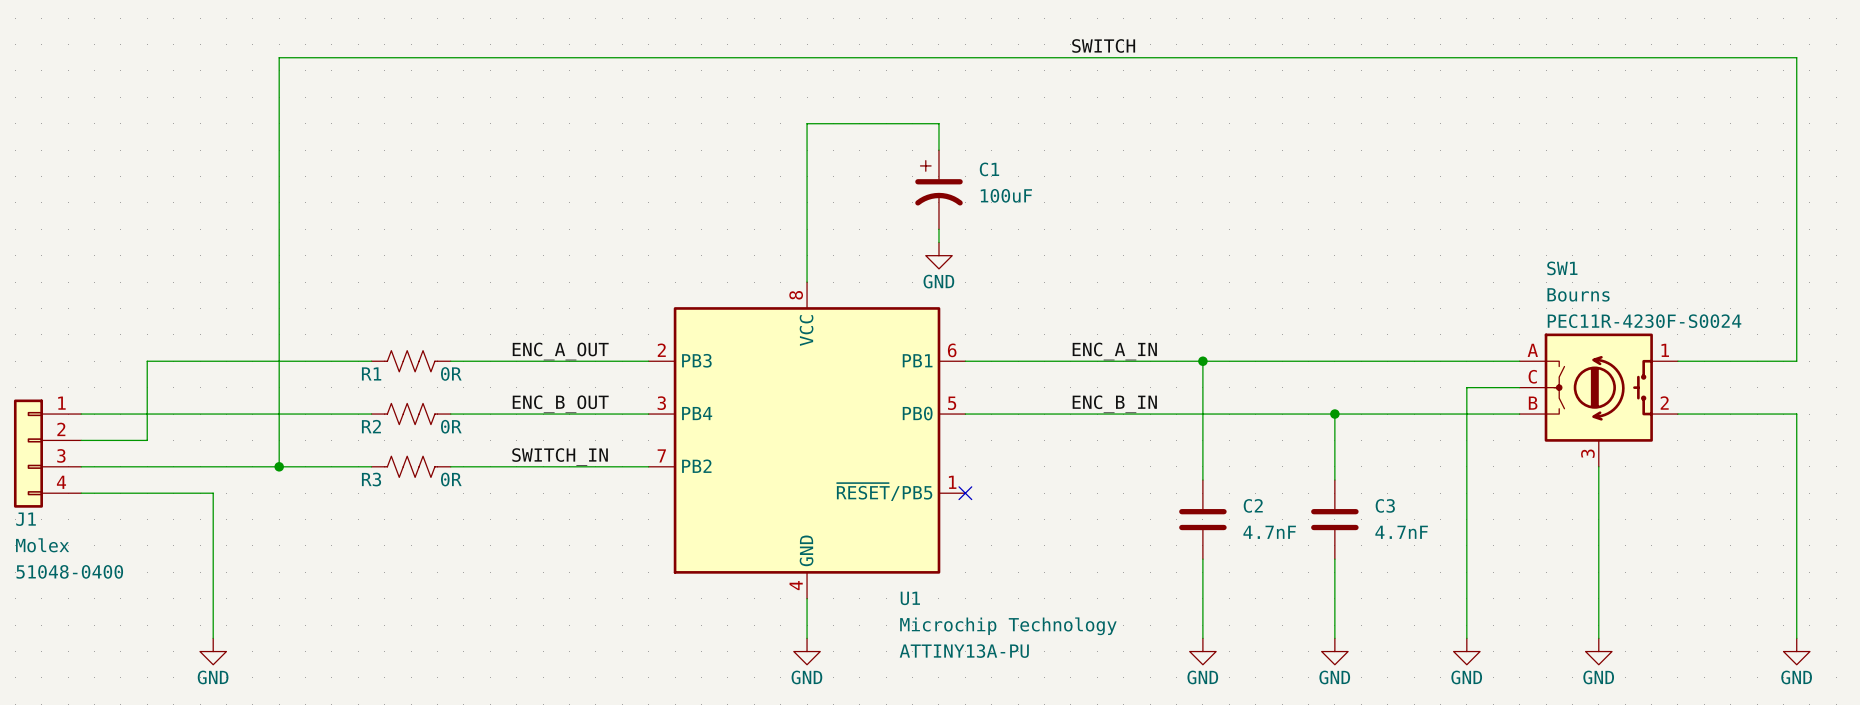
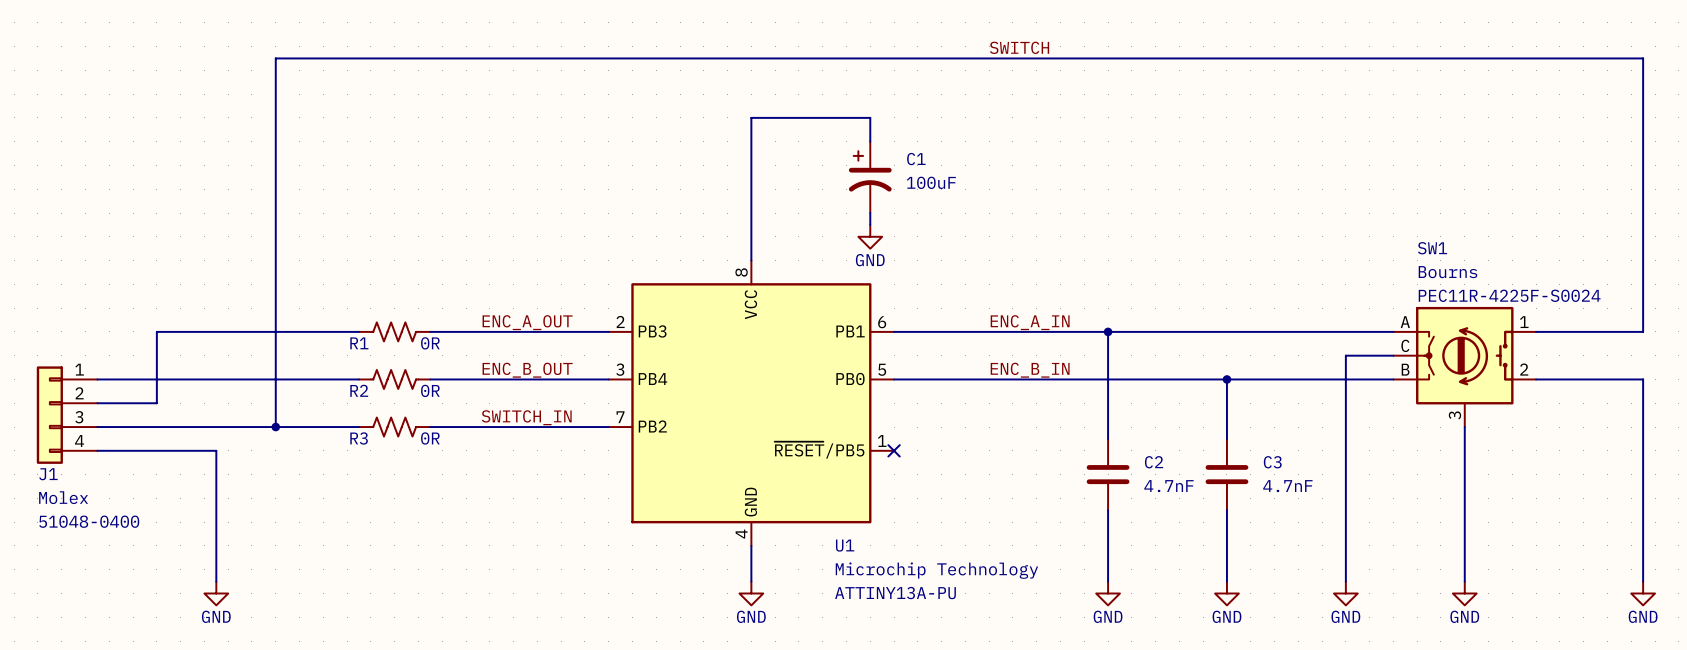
SW1 text: PEC11R-4230F-S0024 (1644, 321) -> PEC11R-4225F-S0024 (1509, 295)

